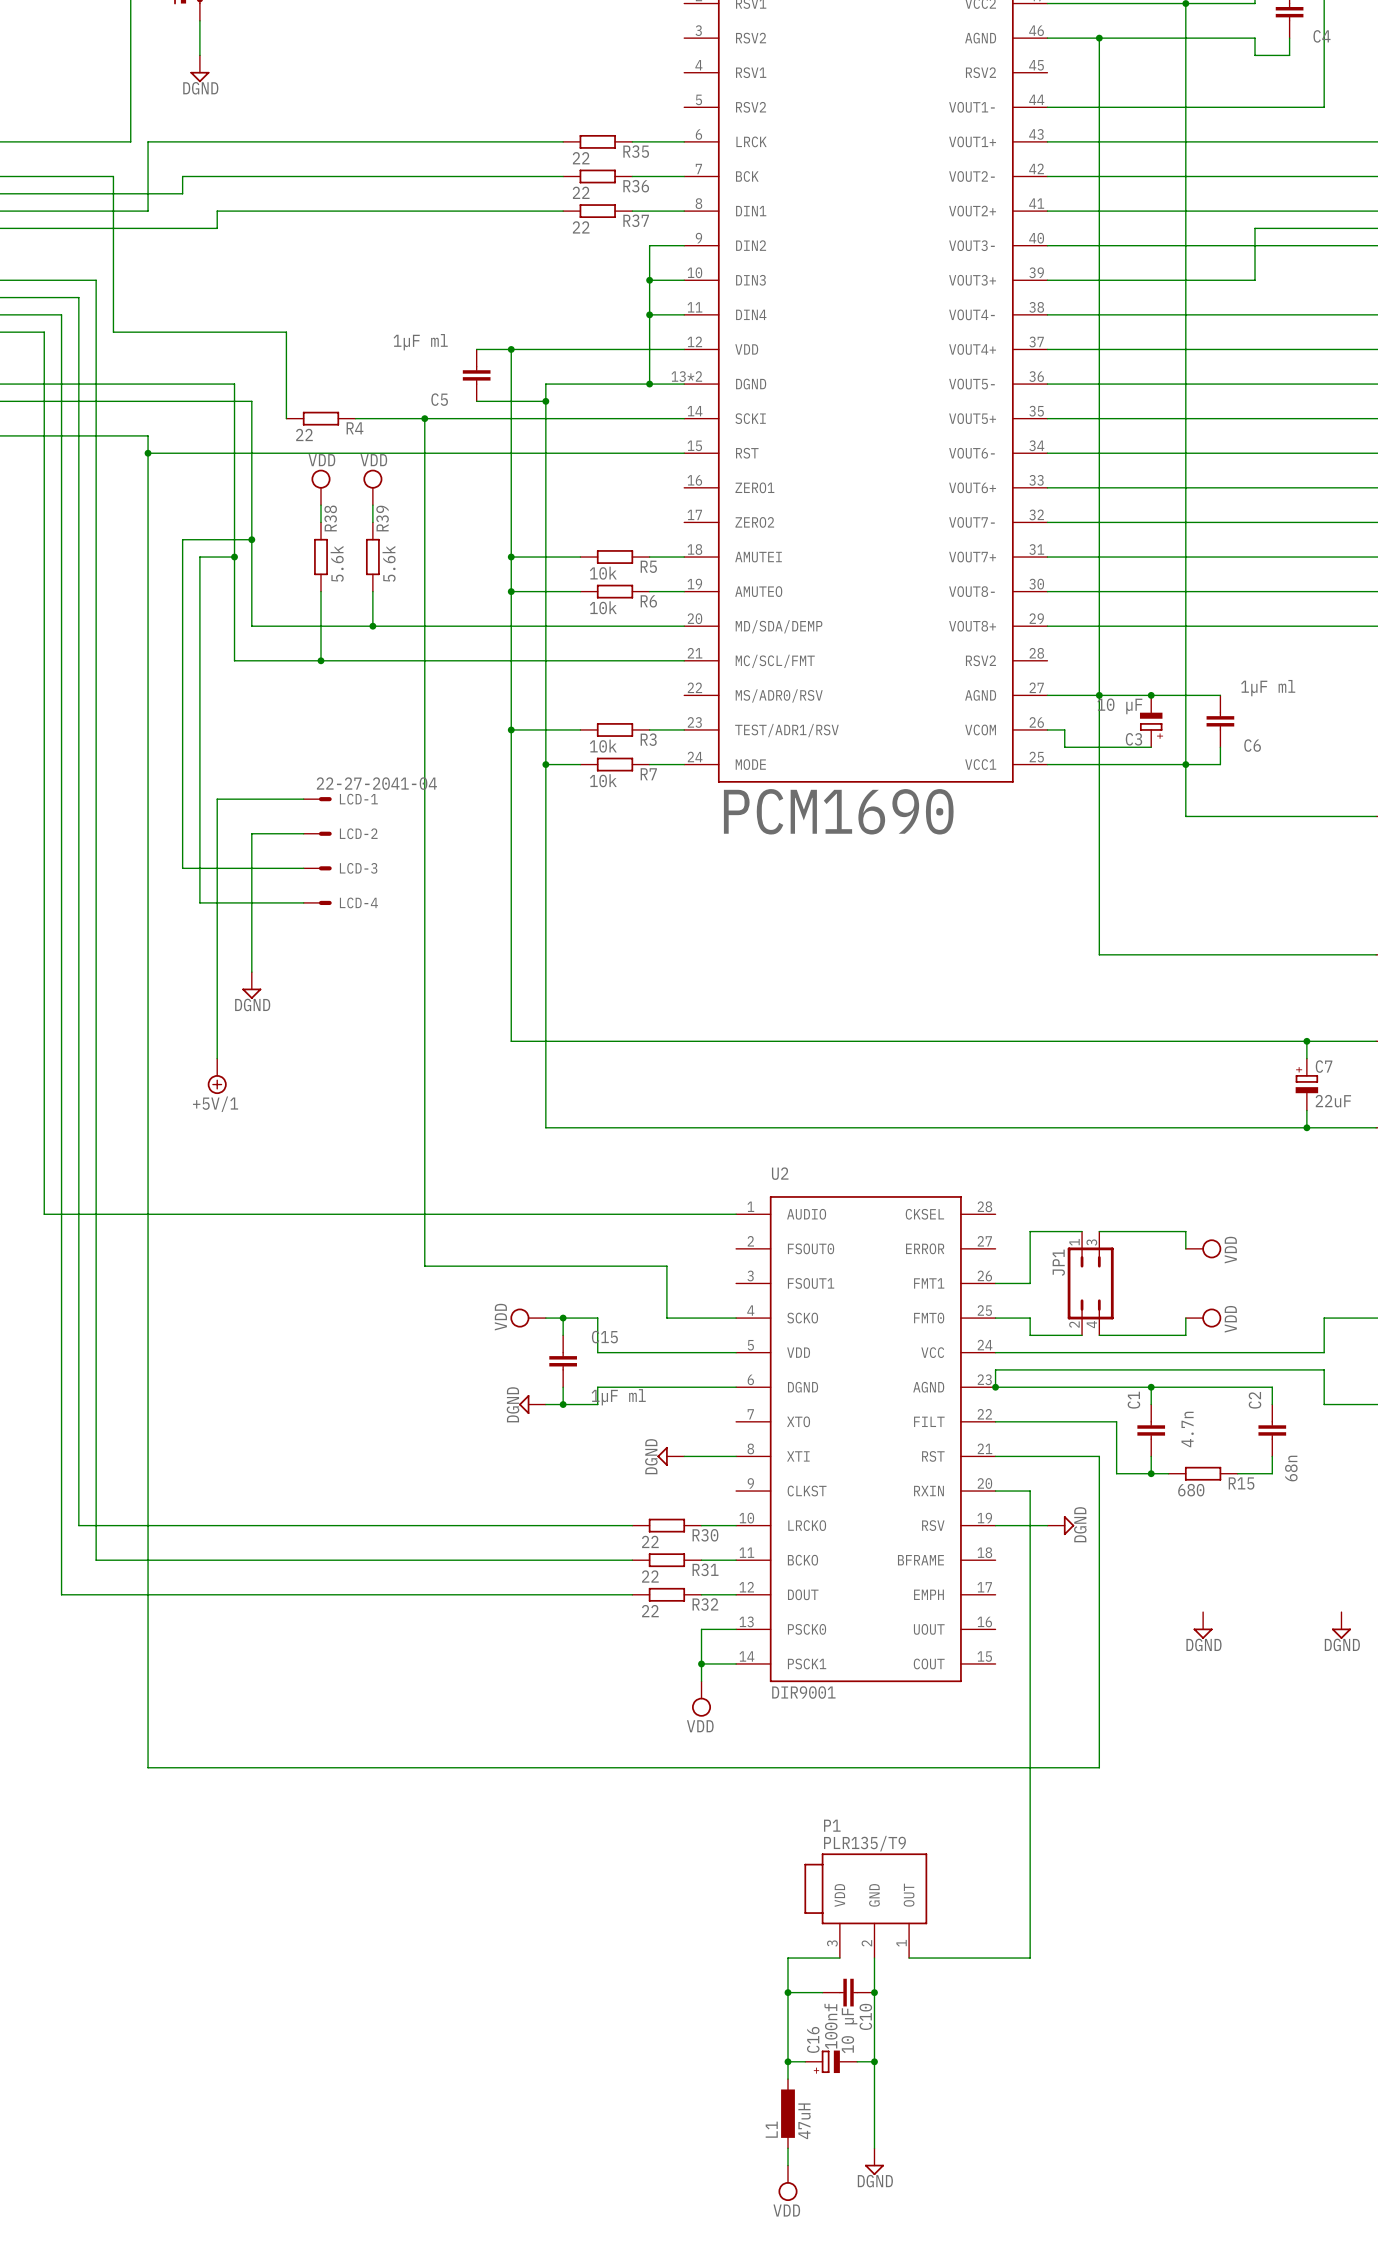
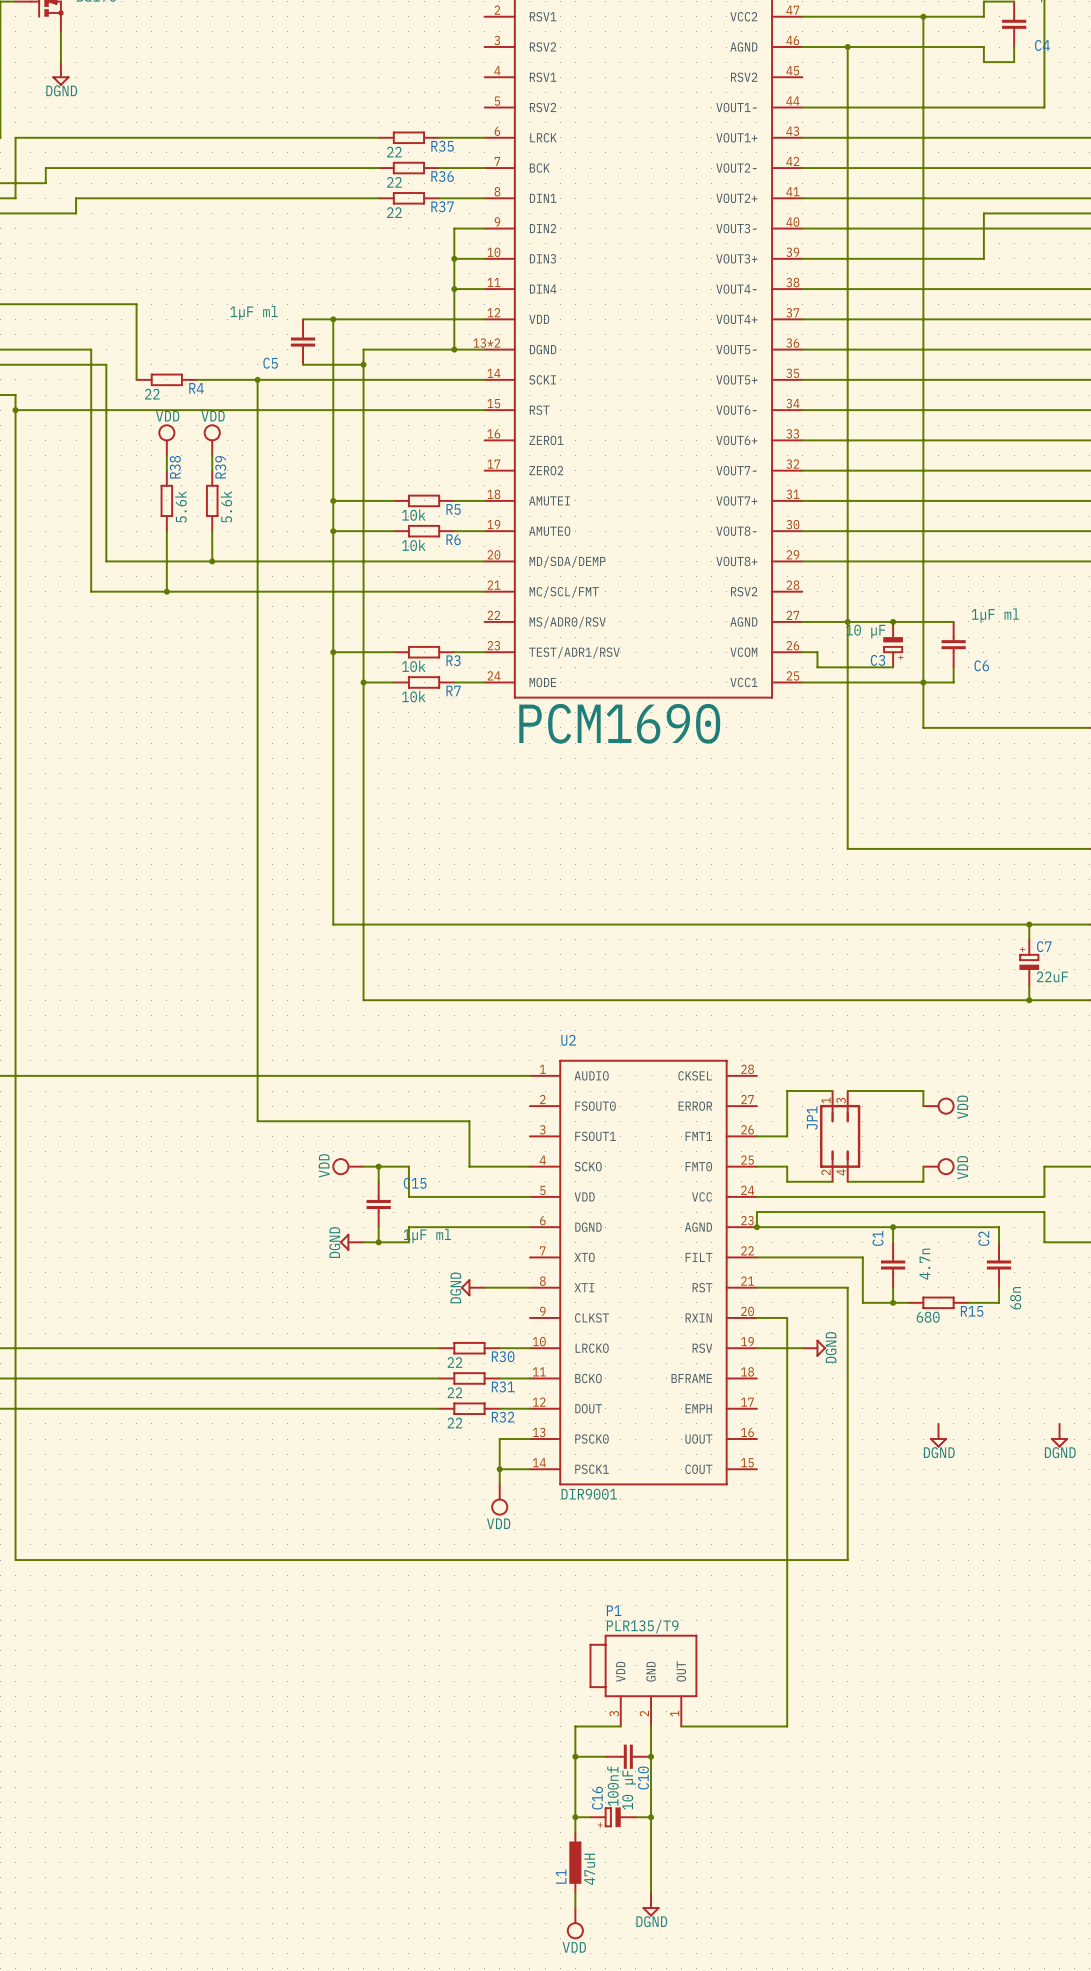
wire: (251, 539) (182, 539) (182, 868) (303, 868) -> none
junction: (251, 539) -> none
wire: (234, 557) (199, 557) (199, 902) (303, 902) -> none
junction: (234, 557) -> none
wire: (303, 799) (217, 799) (217, 1058) -> none
LCD-1: 22-27-2041-04 (317, 799) -> none
wire: (303, 833) (251, 833) (251, 972) -> none
LCD-2: (317, 833) -> none
LCD-3: (317, 868) -> none
LCD-4: (317, 902) -> none
power symbol: DGND (251, 985) -> none
power symbol: +5V/1 (217, 1076) -> none

